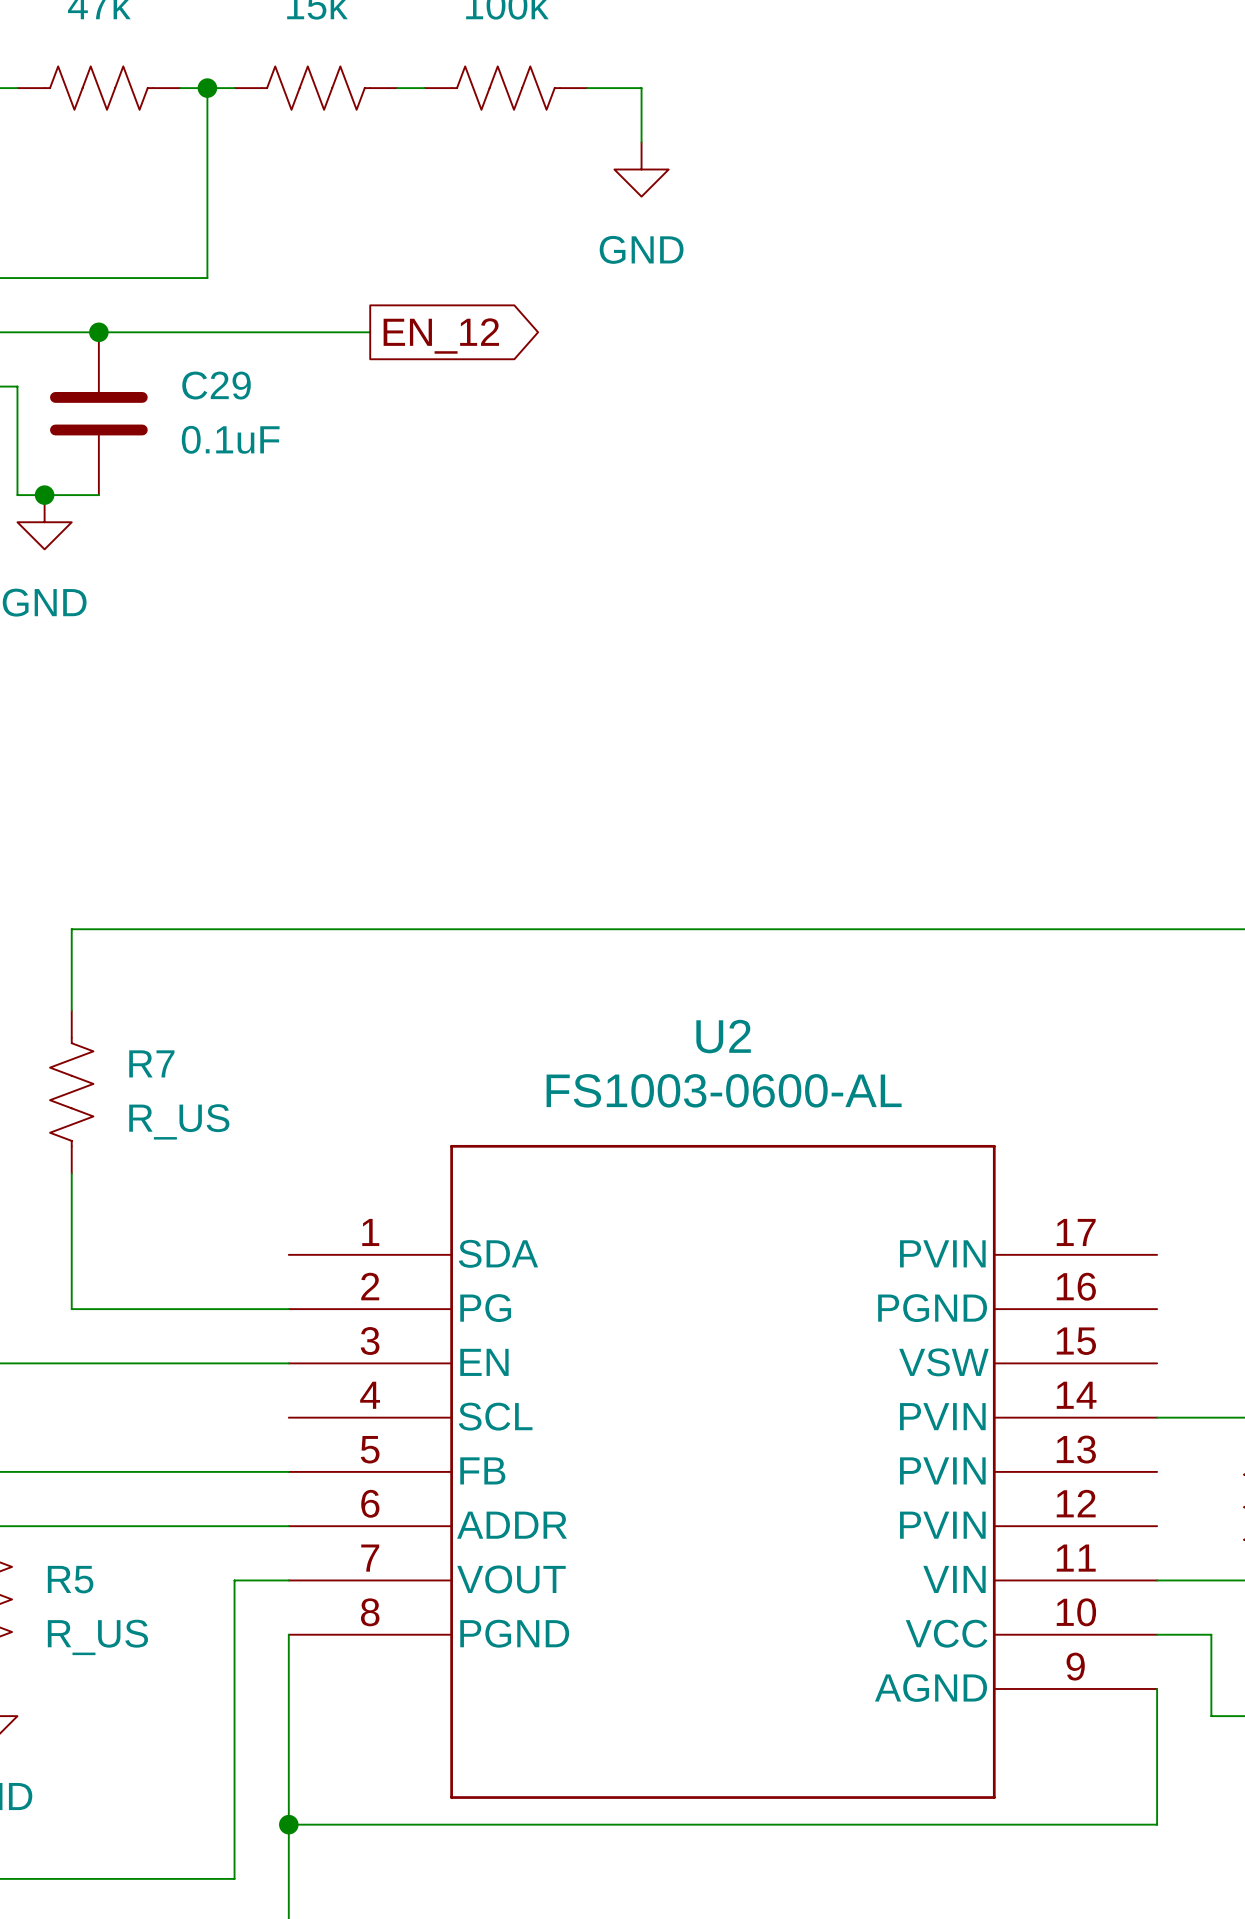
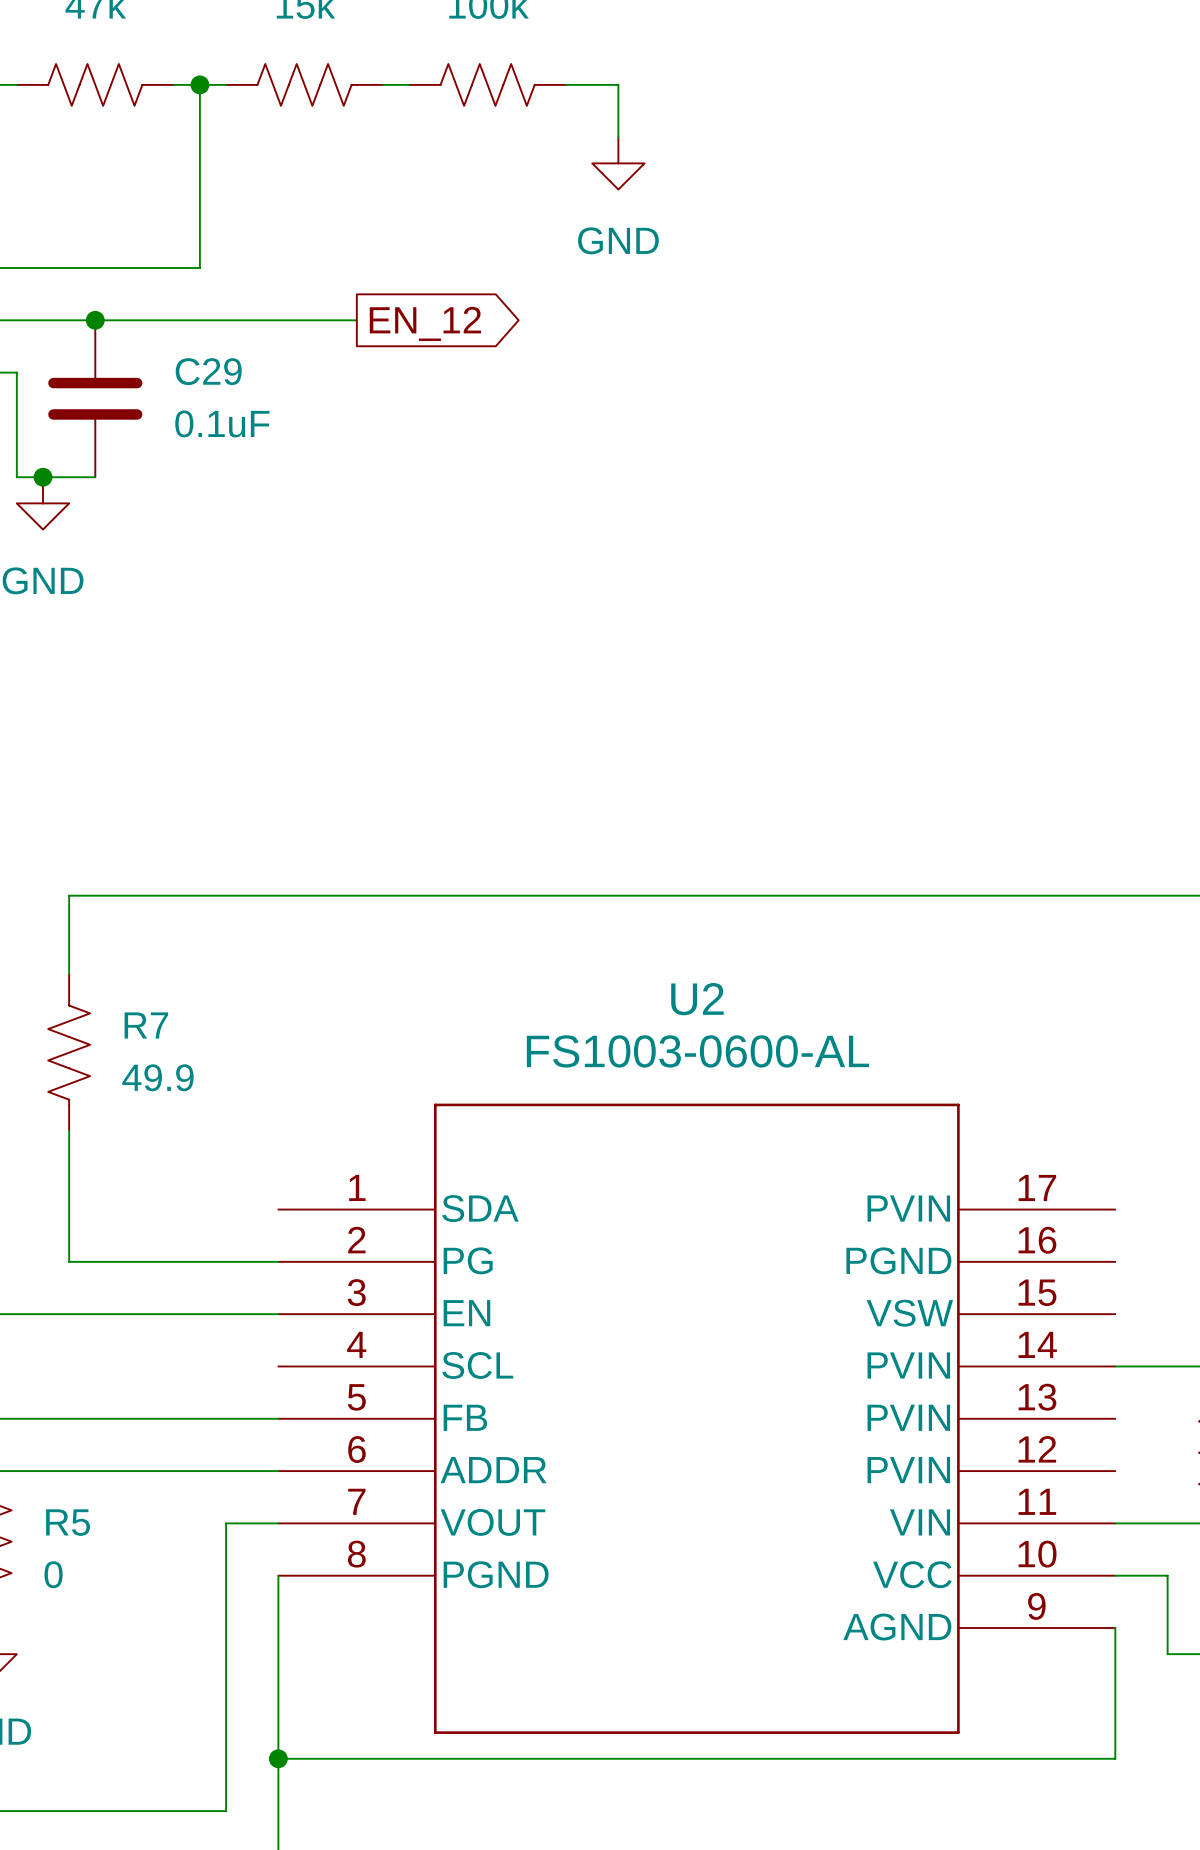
R7 value: R_US (179, 1121) -> 49.9 (157, 1077)
R5 value: R_US (97, 1637) -> 0 (53, 1574)

